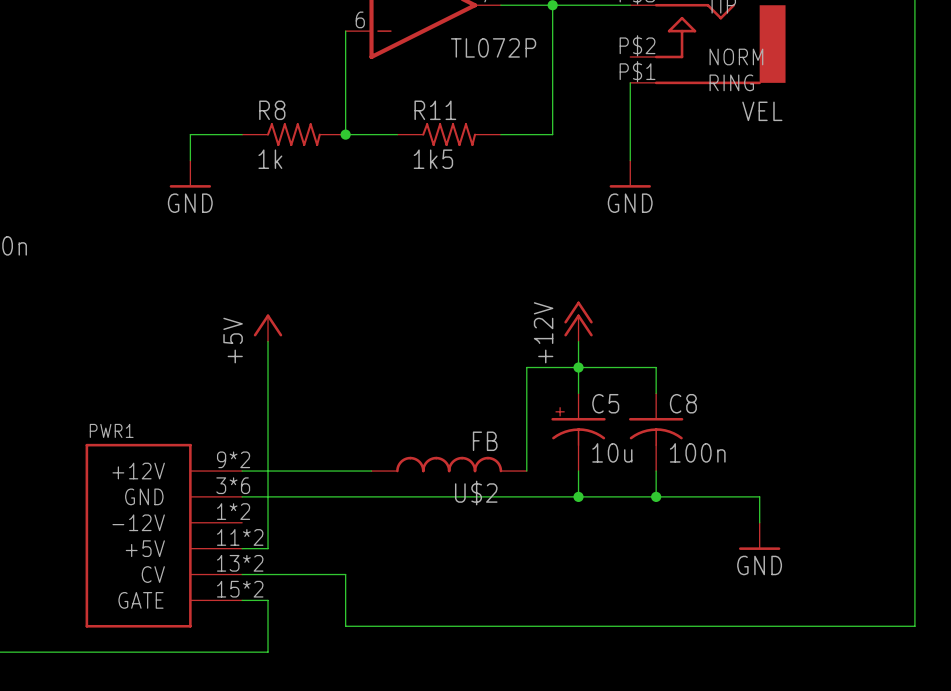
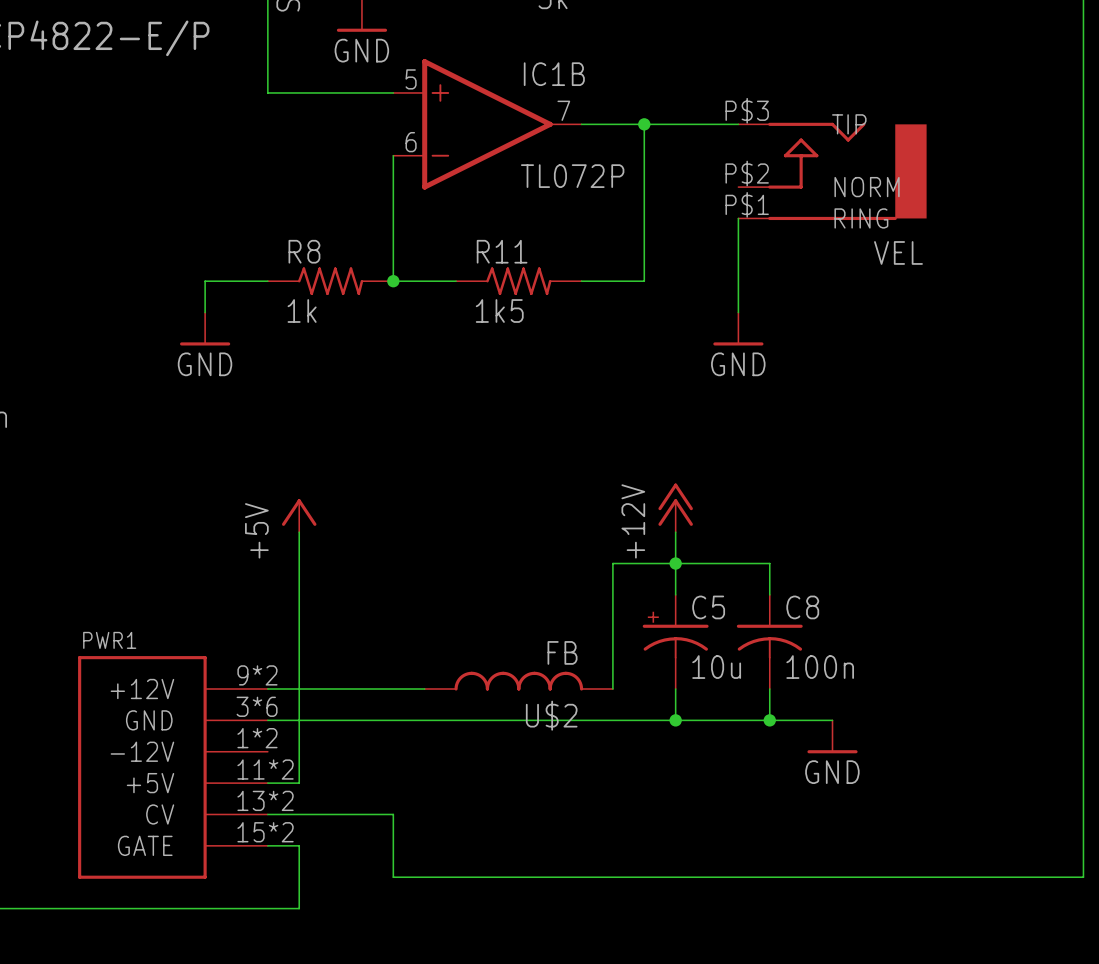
wire: (707, 496) (759, 496) (759, 522) -> none
power symbol position: GND (759, 536) -> GND (832, 736)

